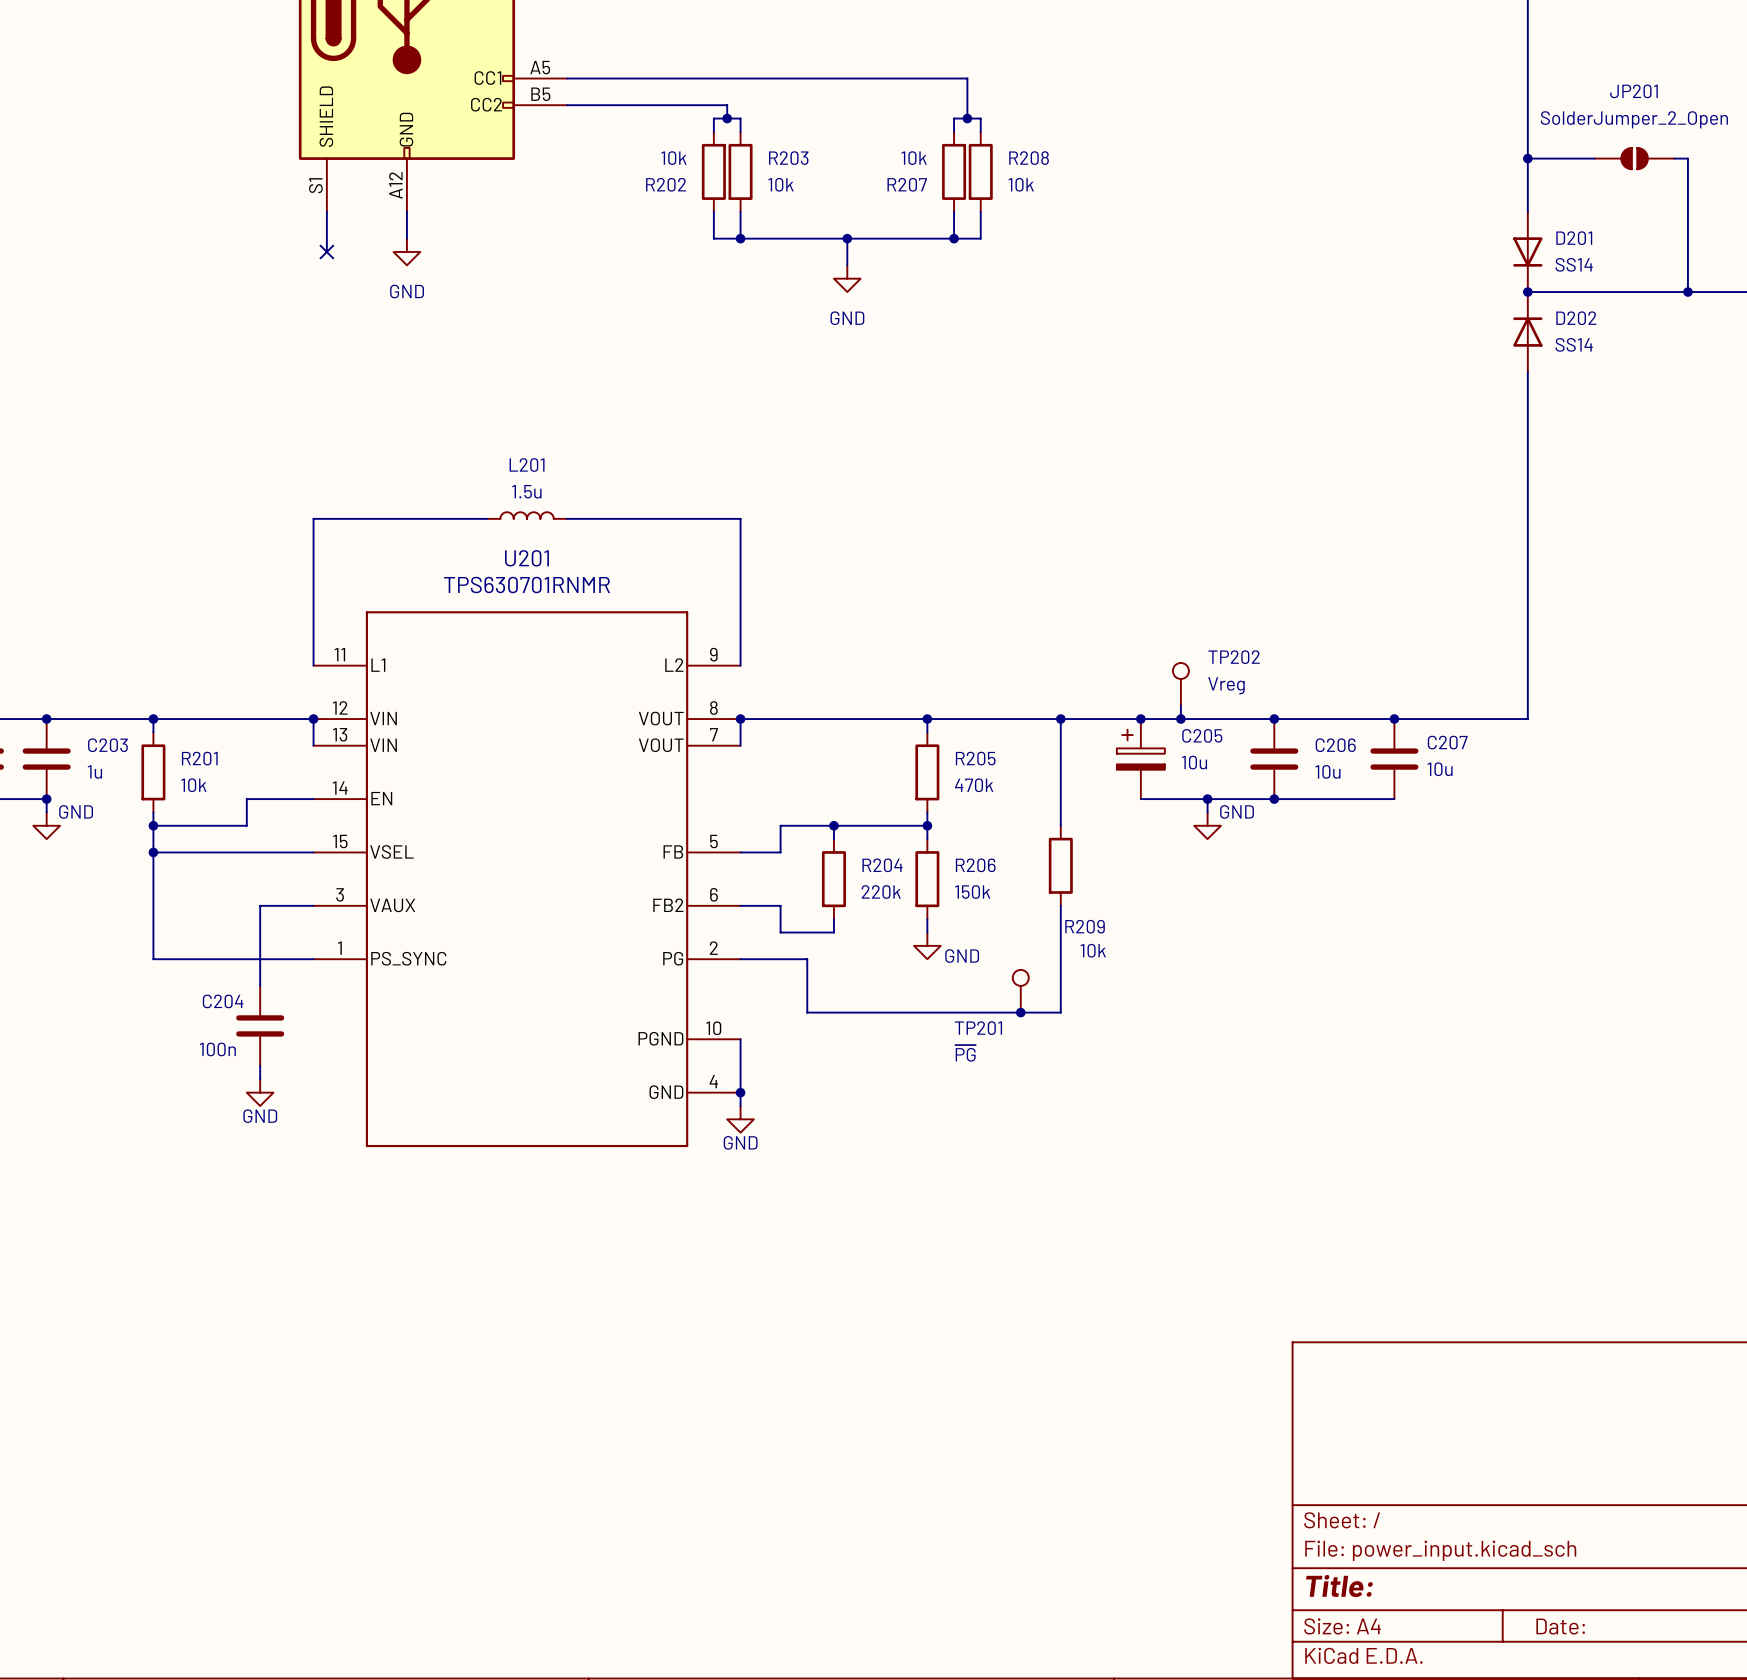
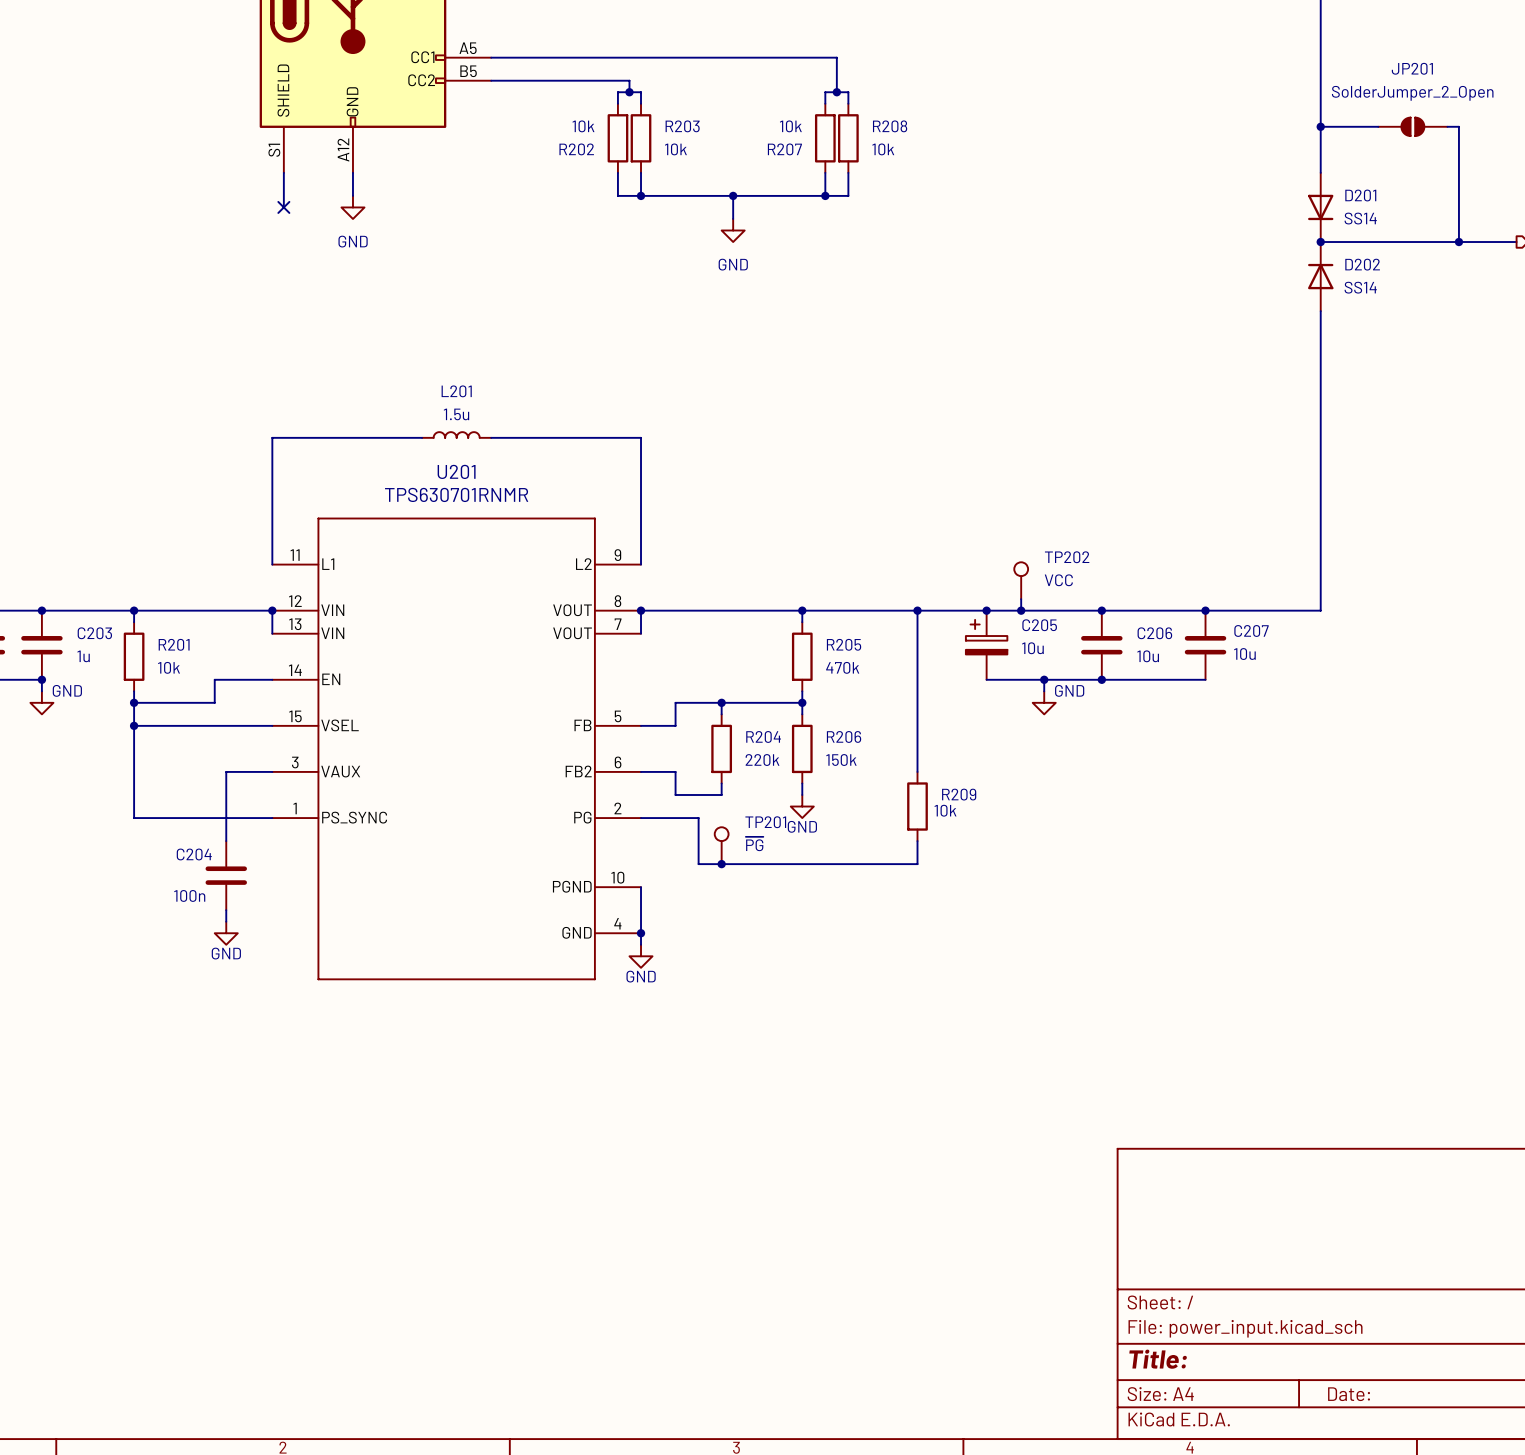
TP202 value: Vreg (1226, 685) -> VCC (1058, 580)
R209 position: (1060, 865) -> (917, 806)
wire: (1060, 905) (1060, 985) -> (917, 771) (917, 702)
R209 name position: R209 (1085, 926) -> R209 (959, 794)
power symbol text position: GND (962, 956) -> GND (802, 826)
TP201 position: (1020, 991) -> (721, 845)
junction: none -> (721, 864)
junction: (1020, 1012) -> none
TP201 name position: TP201 (978, 1028) -> TP201 (765, 822)
TP201 value position: ~{PG} (965, 1053) -> ~{PG} (754, 844)

